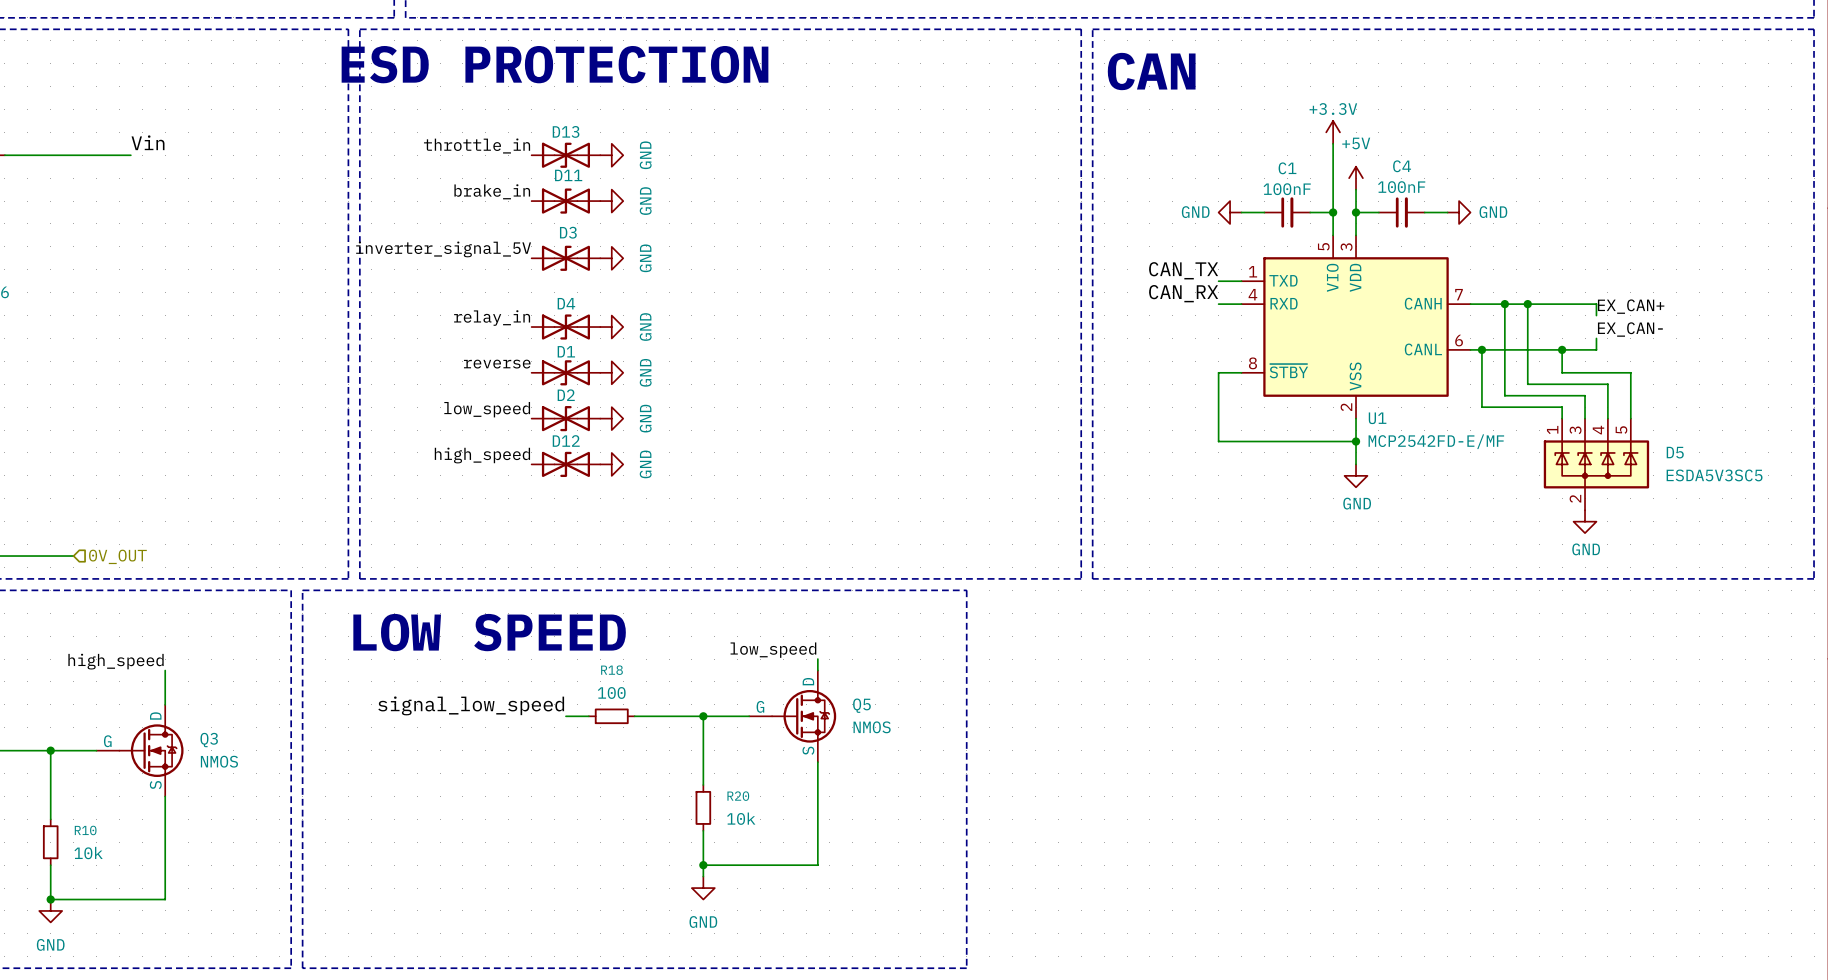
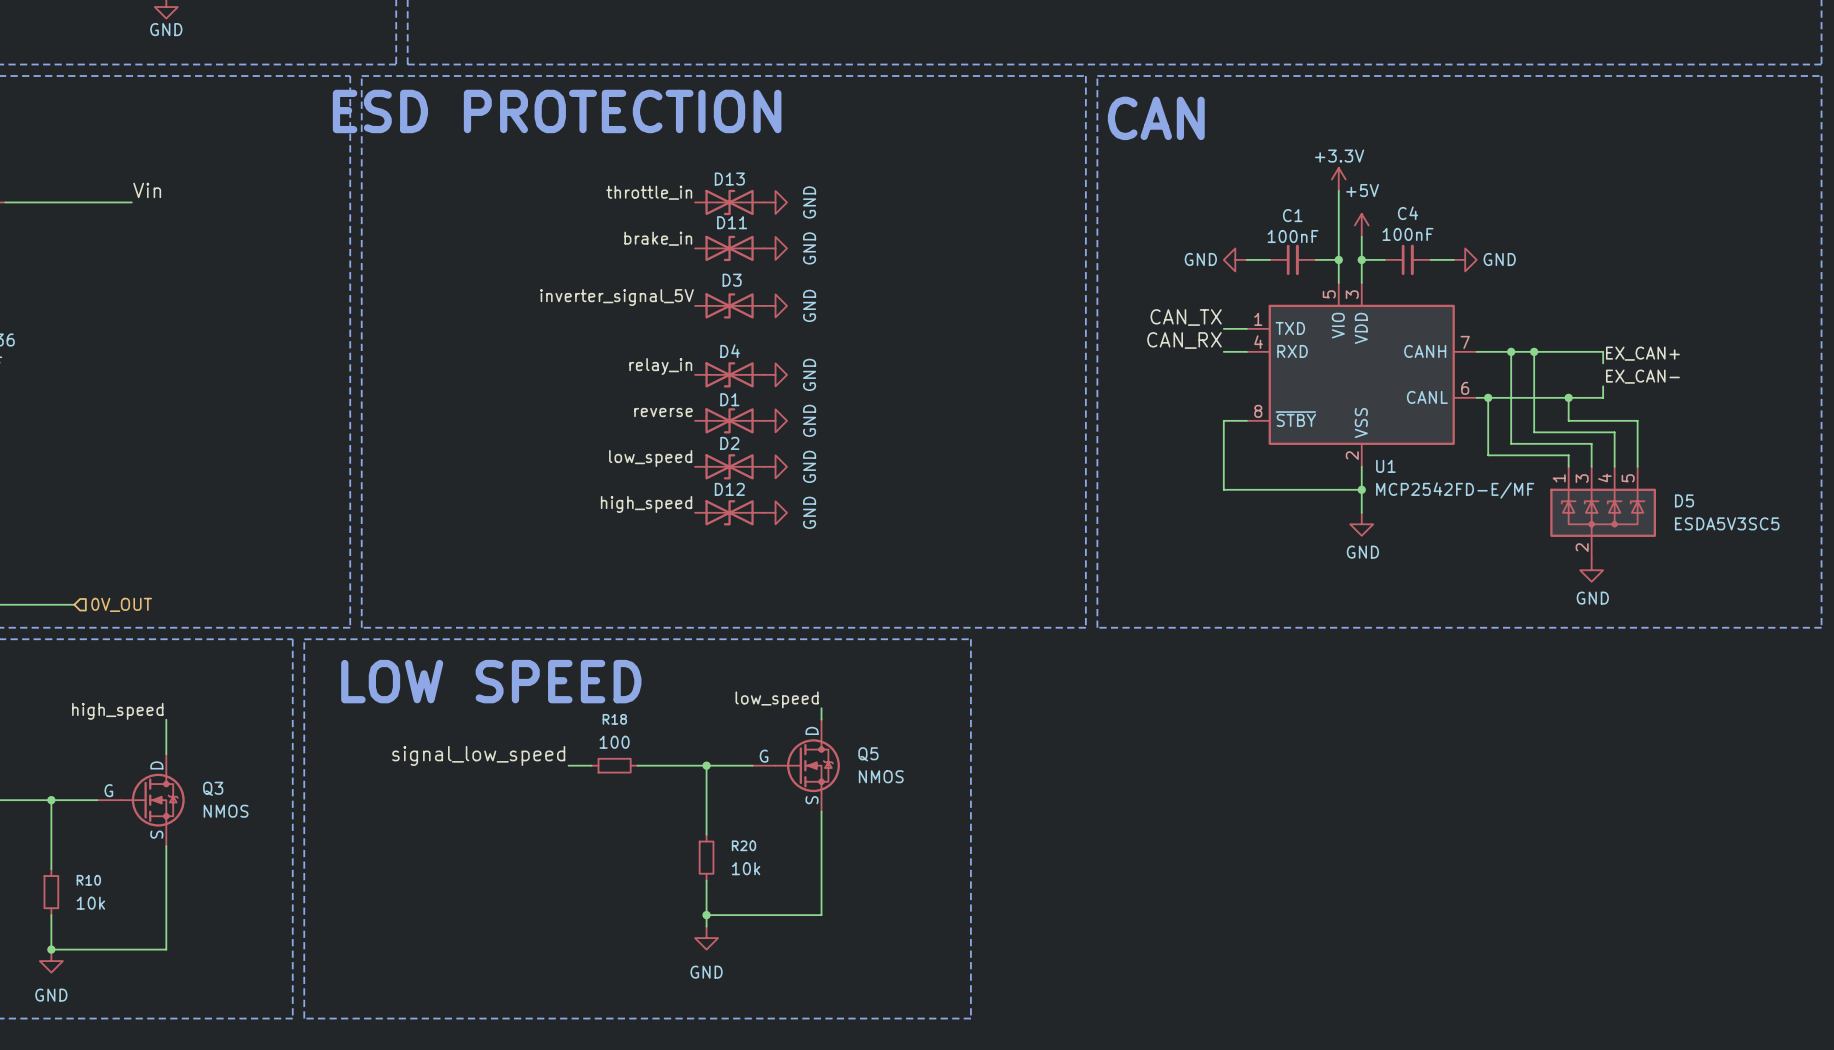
label position: throttle_in (477, 146) -> throttle_in (649, 192)
D13 position: (565, 155) -> (729, 202)
power symbol: GND (611, 155) -> none
power symbol: none -> GND (775, 202)
label position: brake_in (492, 191) -> brake_in (658, 238)
D11 position: (565, 201) -> (729, 248)
power symbol: GND (611, 201) -> none
power symbol: none -> GND (775, 248)
label position: inverter_signal_5V (443, 249) -> inverter_signal_5V (616, 297)
D3 position: (565, 258) -> (729, 305)
power symbol: GND (611, 258) -> none
power symbol: none -> GND (775, 305)
label position: relay_in (492, 318) -> relay_in (660, 366)
D4 position: (565, 327) -> (729, 374)
power symbol: GND (611, 327) -> none
power symbol: none -> GND (775, 374)
label position: reverse (497, 364) -> reverse (663, 412)
D1 position: (565, 372) -> (729, 420)
power symbol: GND (611, 372) -> none
power symbol: none -> GND (775, 420)
label position: low_speed (487, 409) -> low_speed (650, 458)
D2 position: (565, 418) -> (729, 466)
power symbol: GND (611, 418) -> none
power symbol: none -> GND (775, 466)
label position: high_speed (482, 455) -> high_speed (646, 504)
D12 position: (565, 464) -> (729, 512)
power symbol: GND (611, 464) -> none
power symbol: none -> GND (775, 512)

